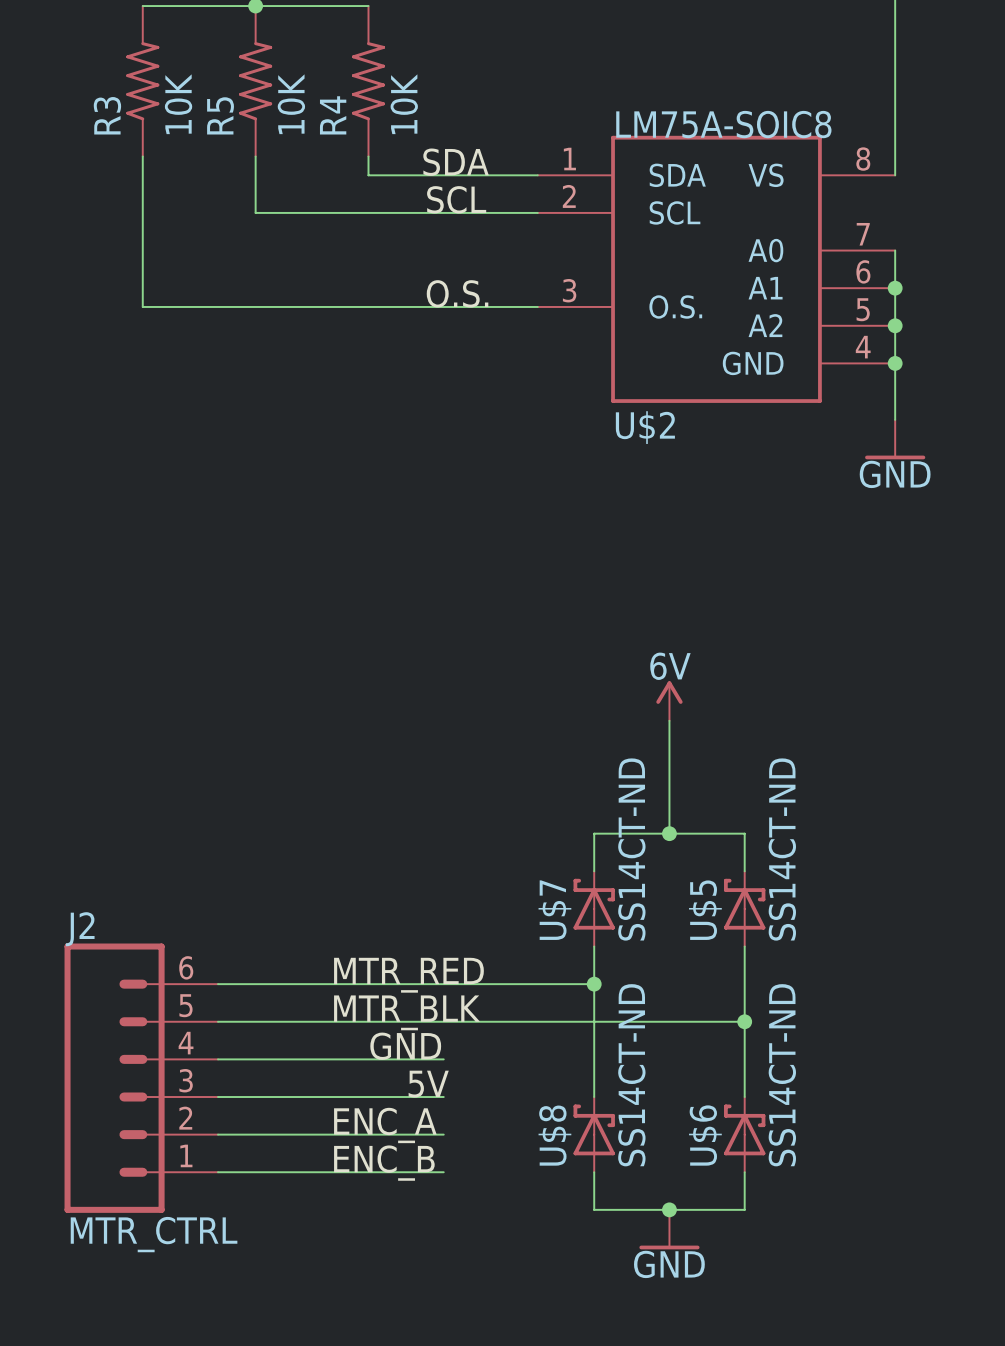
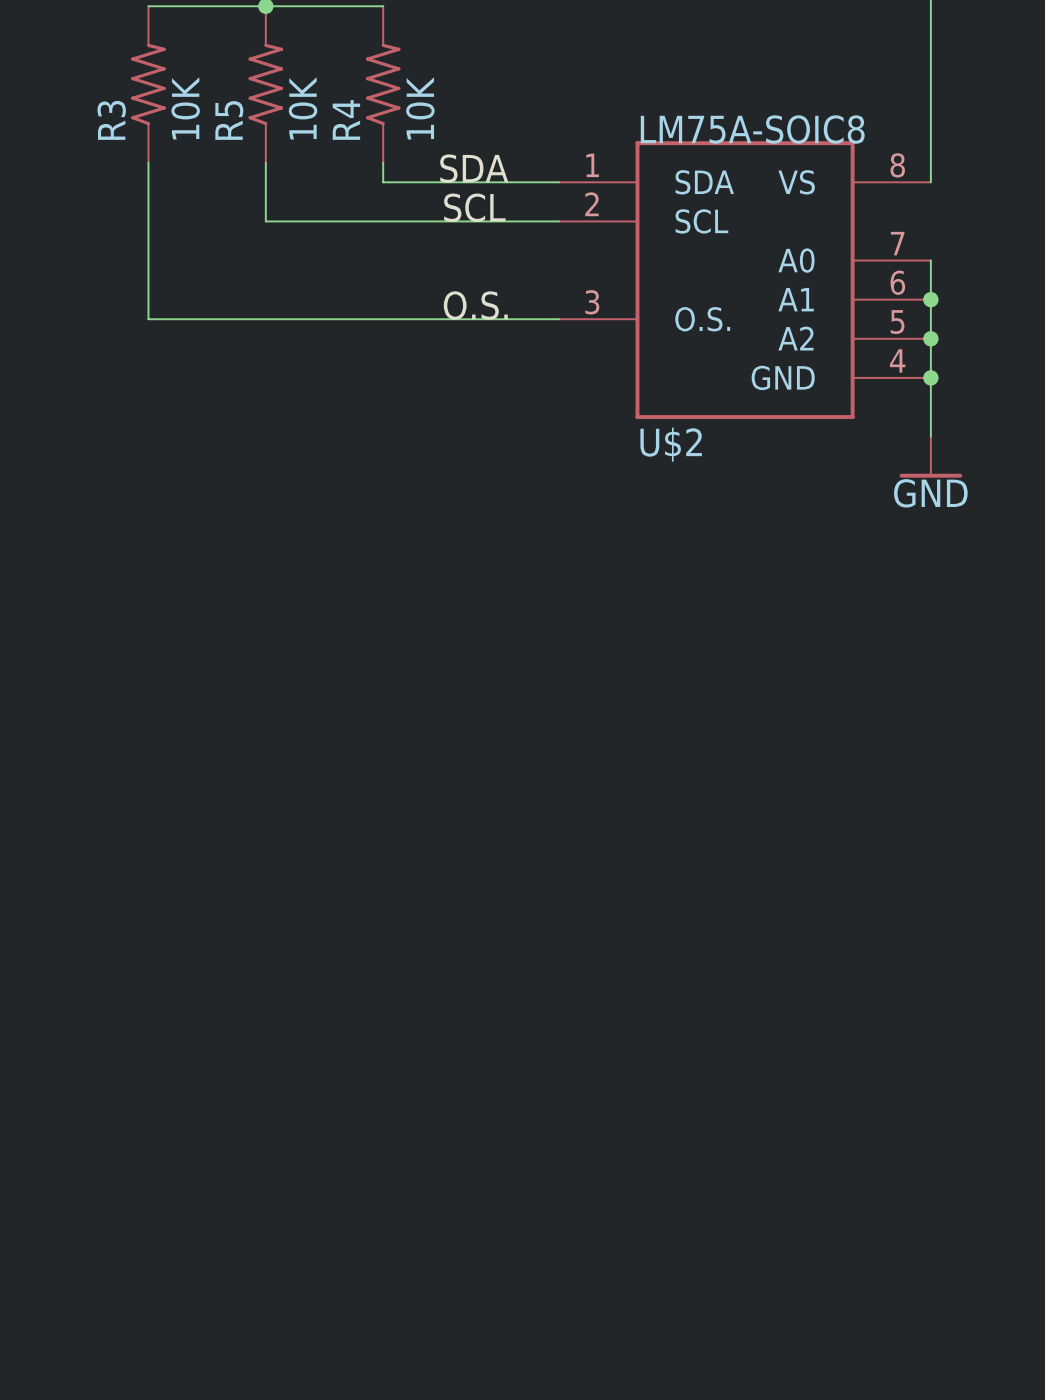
power symbol: 6V (669, 701) -> none
wire: (669, 720) (669, 833) -> none
junction: (669, 833) -> none
wire: (594, 871) (594, 833) (744, 833) (744, 871) -> none
U$7: SS14CT-ND (594, 908) -> none
U$5: SS14CT-ND (744, 908) -> none
wire: (594, 946) (594, 1097) -> none
wire: (744, 946) (744, 1097) -> none
label: MTR_RED (408, 975) -> none
wire: (218, 984) (594, 984) -> none
junction: (594, 984) -> none
label: MTR_BLK (407, 1012) -> none
wire: (218, 1021) (744, 1021) -> none
junction: (744, 1021) -> none
label: GND (405, 1046) -> none
wire: (218, 1059) (443, 1059) -> none
J2: MTR_CTRL (141, 1078) -> none
label: 5V (428, 1084) -> none
wire: (218, 1097) (443, 1097) -> none
label: ENC_A (385, 1125) -> none
wire: (218, 1134) (443, 1134) -> none
U$8: SS14CT-ND (594, 1134) -> none
U$6: SS14CT-ND (744, 1134) -> none
label: ENC_B (384, 1163) -> none
wire: (218, 1172) (443, 1172) -> none
wire: (594, 1172) (594, 1209) (744, 1209) (744, 1172) -> none
junction: (669, 1209) -> none
power symbol: GND (669, 1229) -> none

